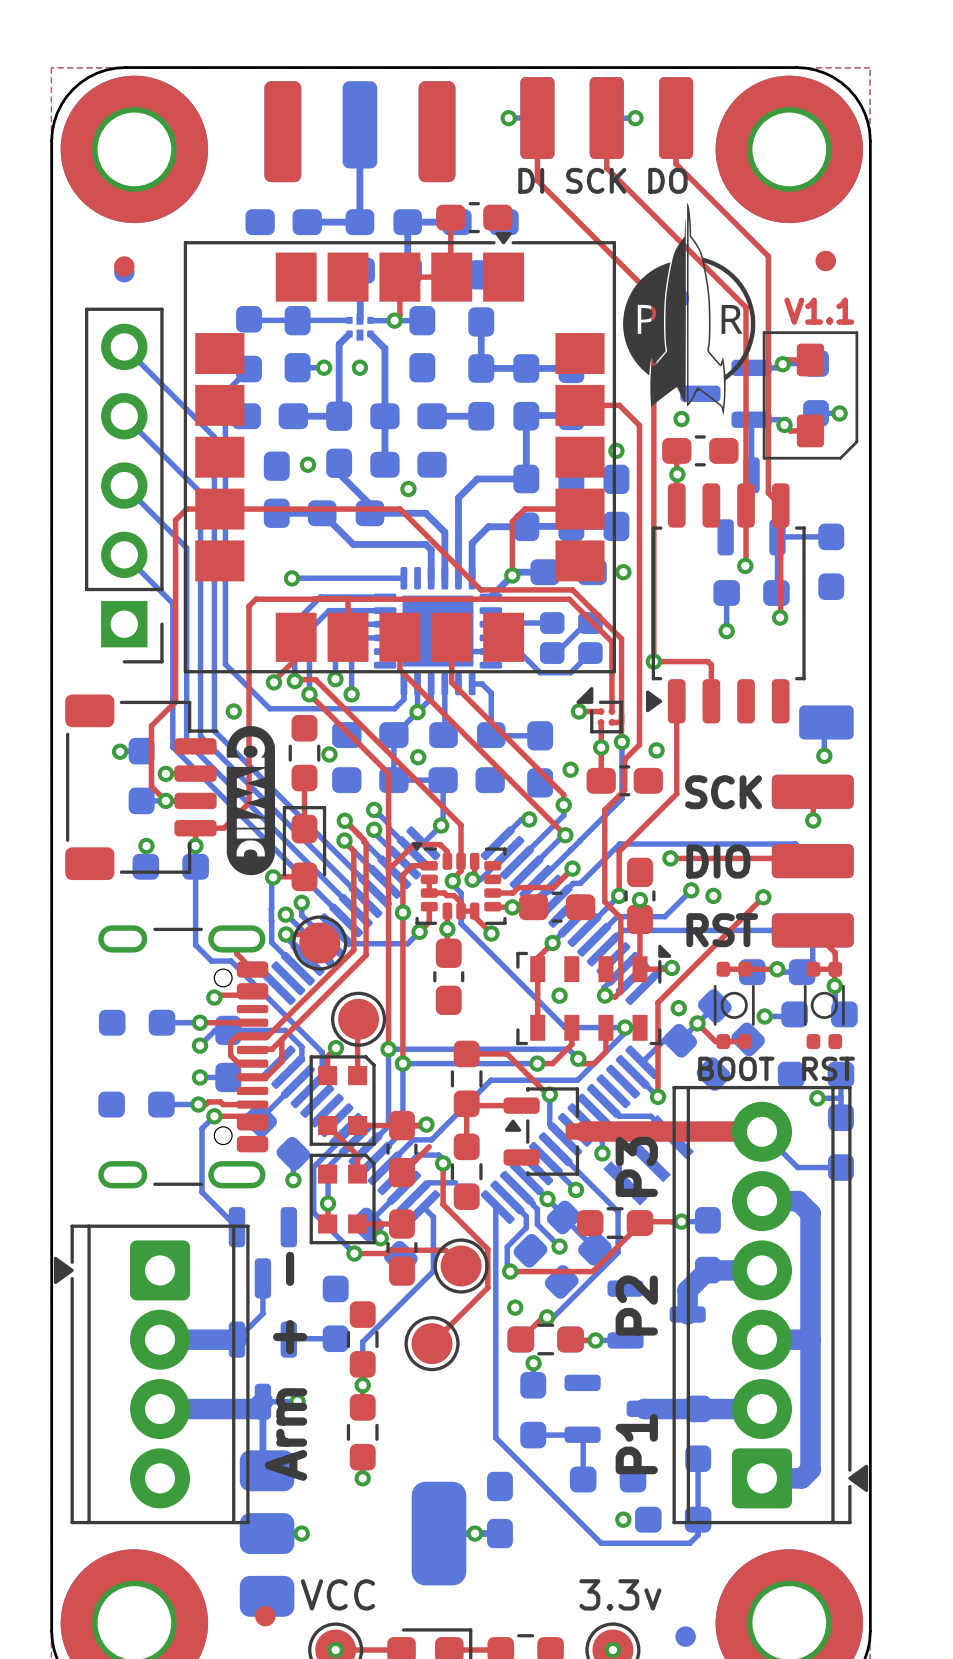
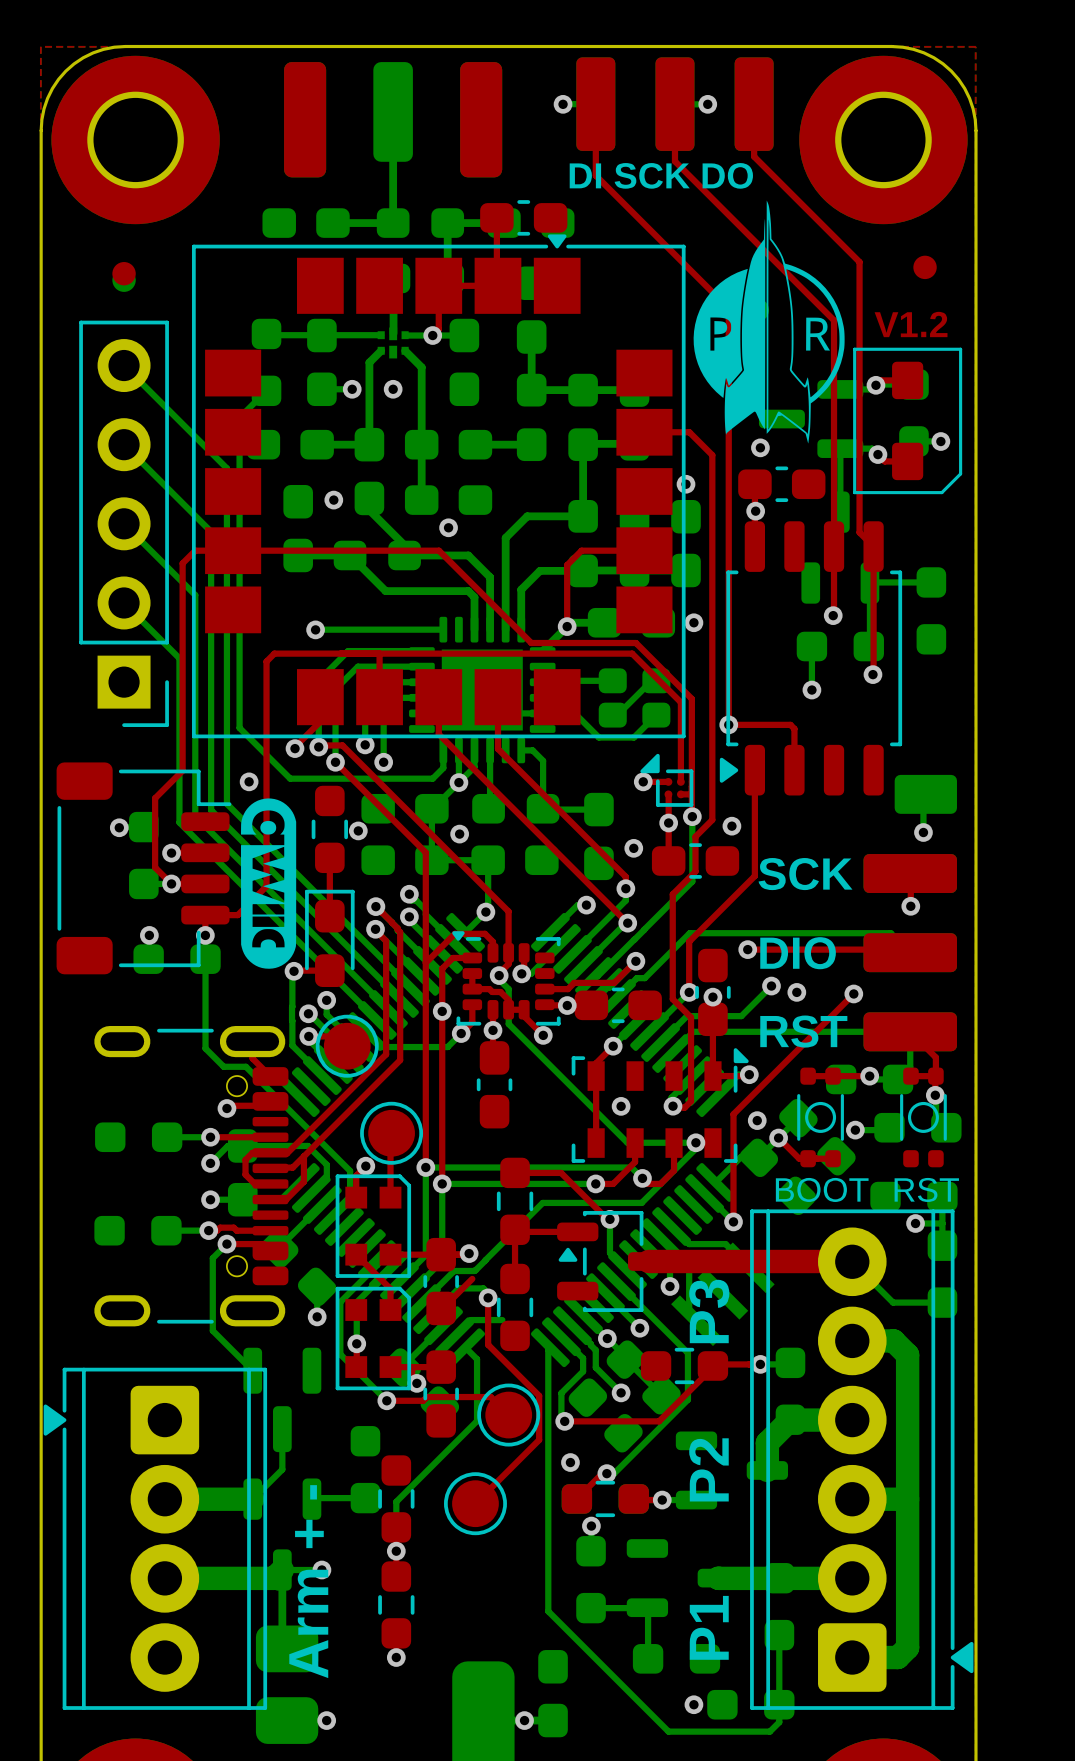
text: V1.1 (819, 311) -> V1.2 (911, 324)

